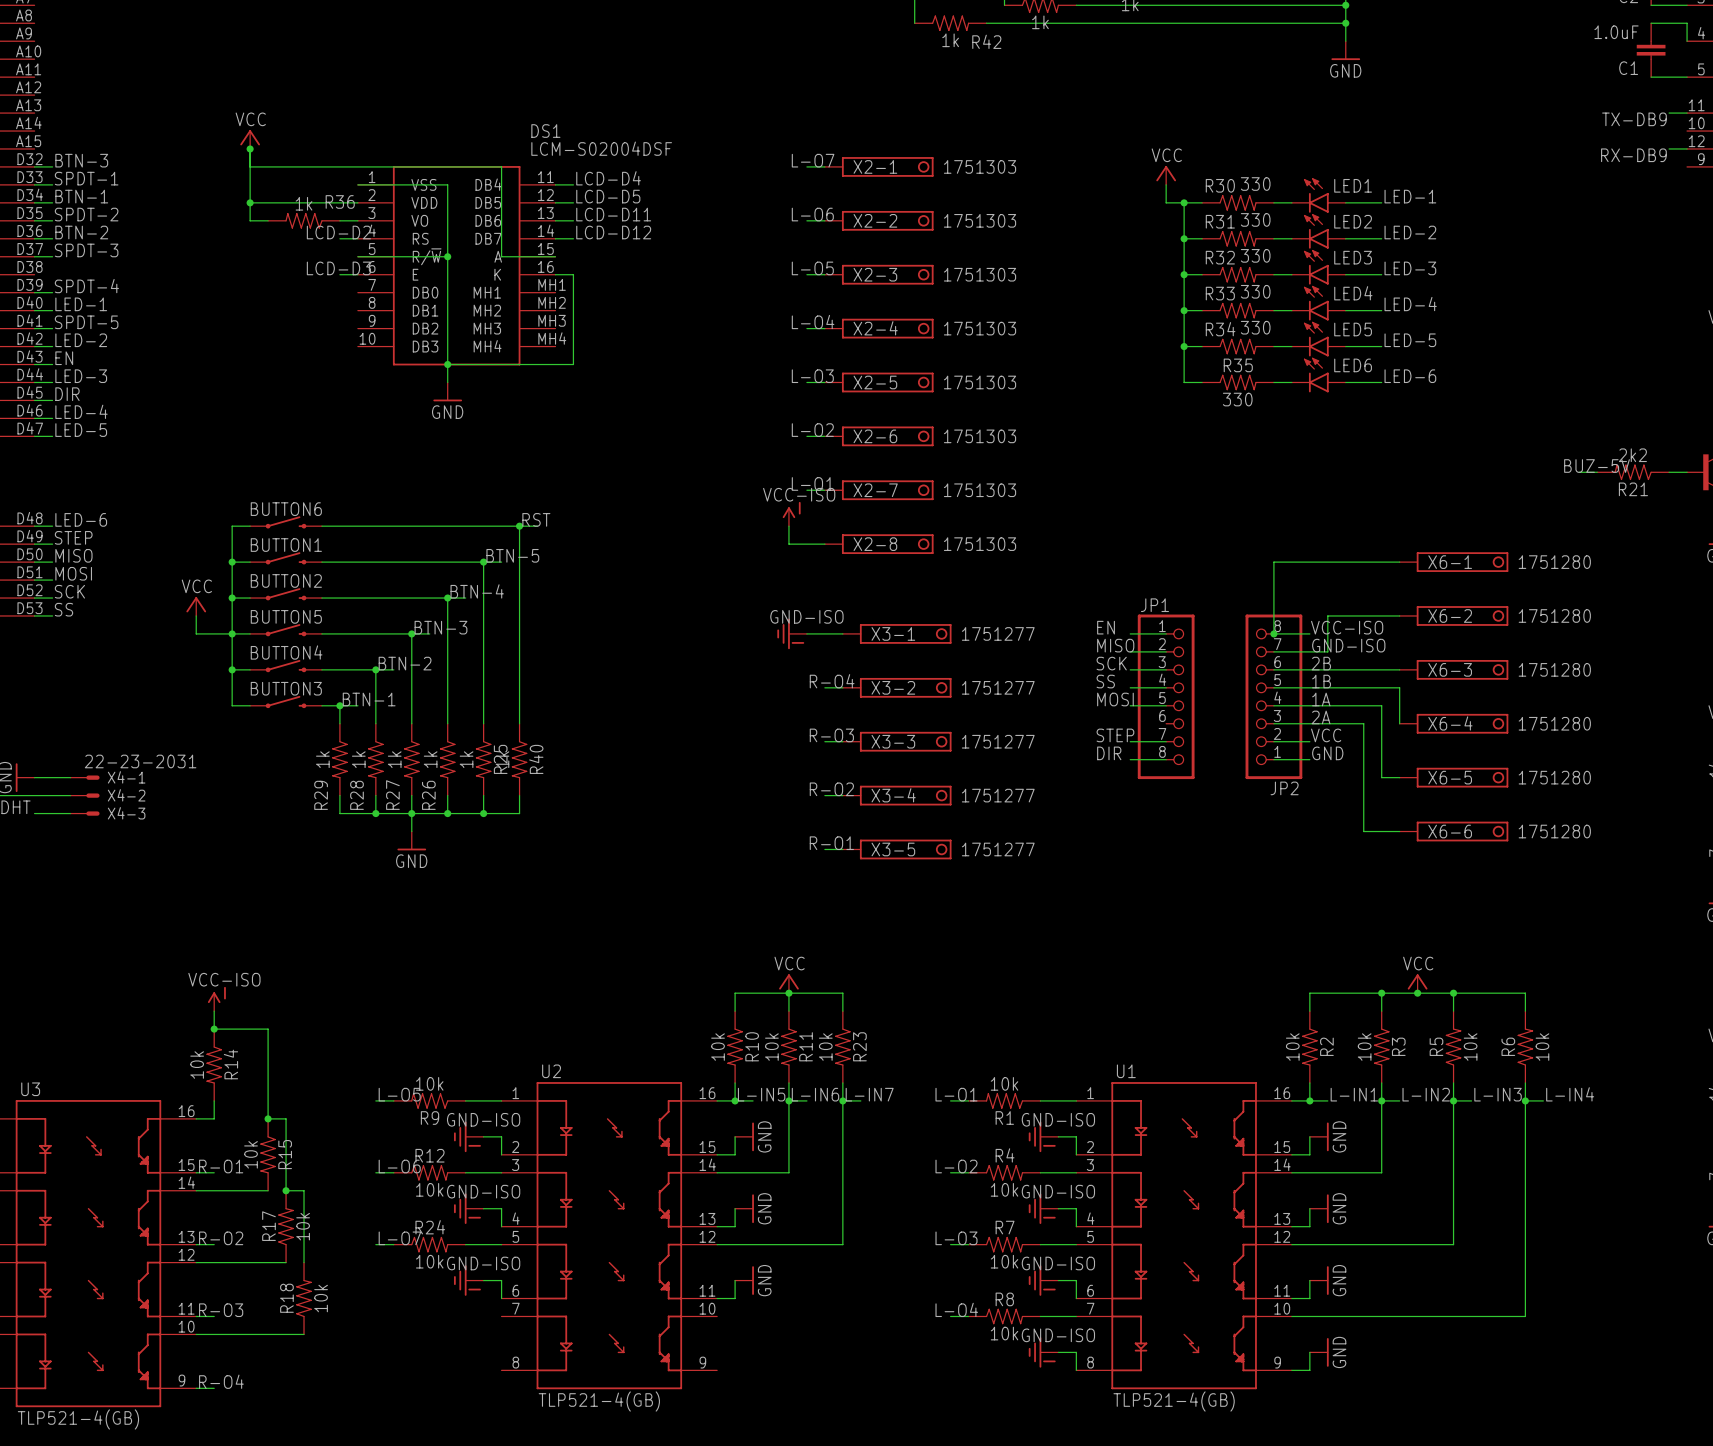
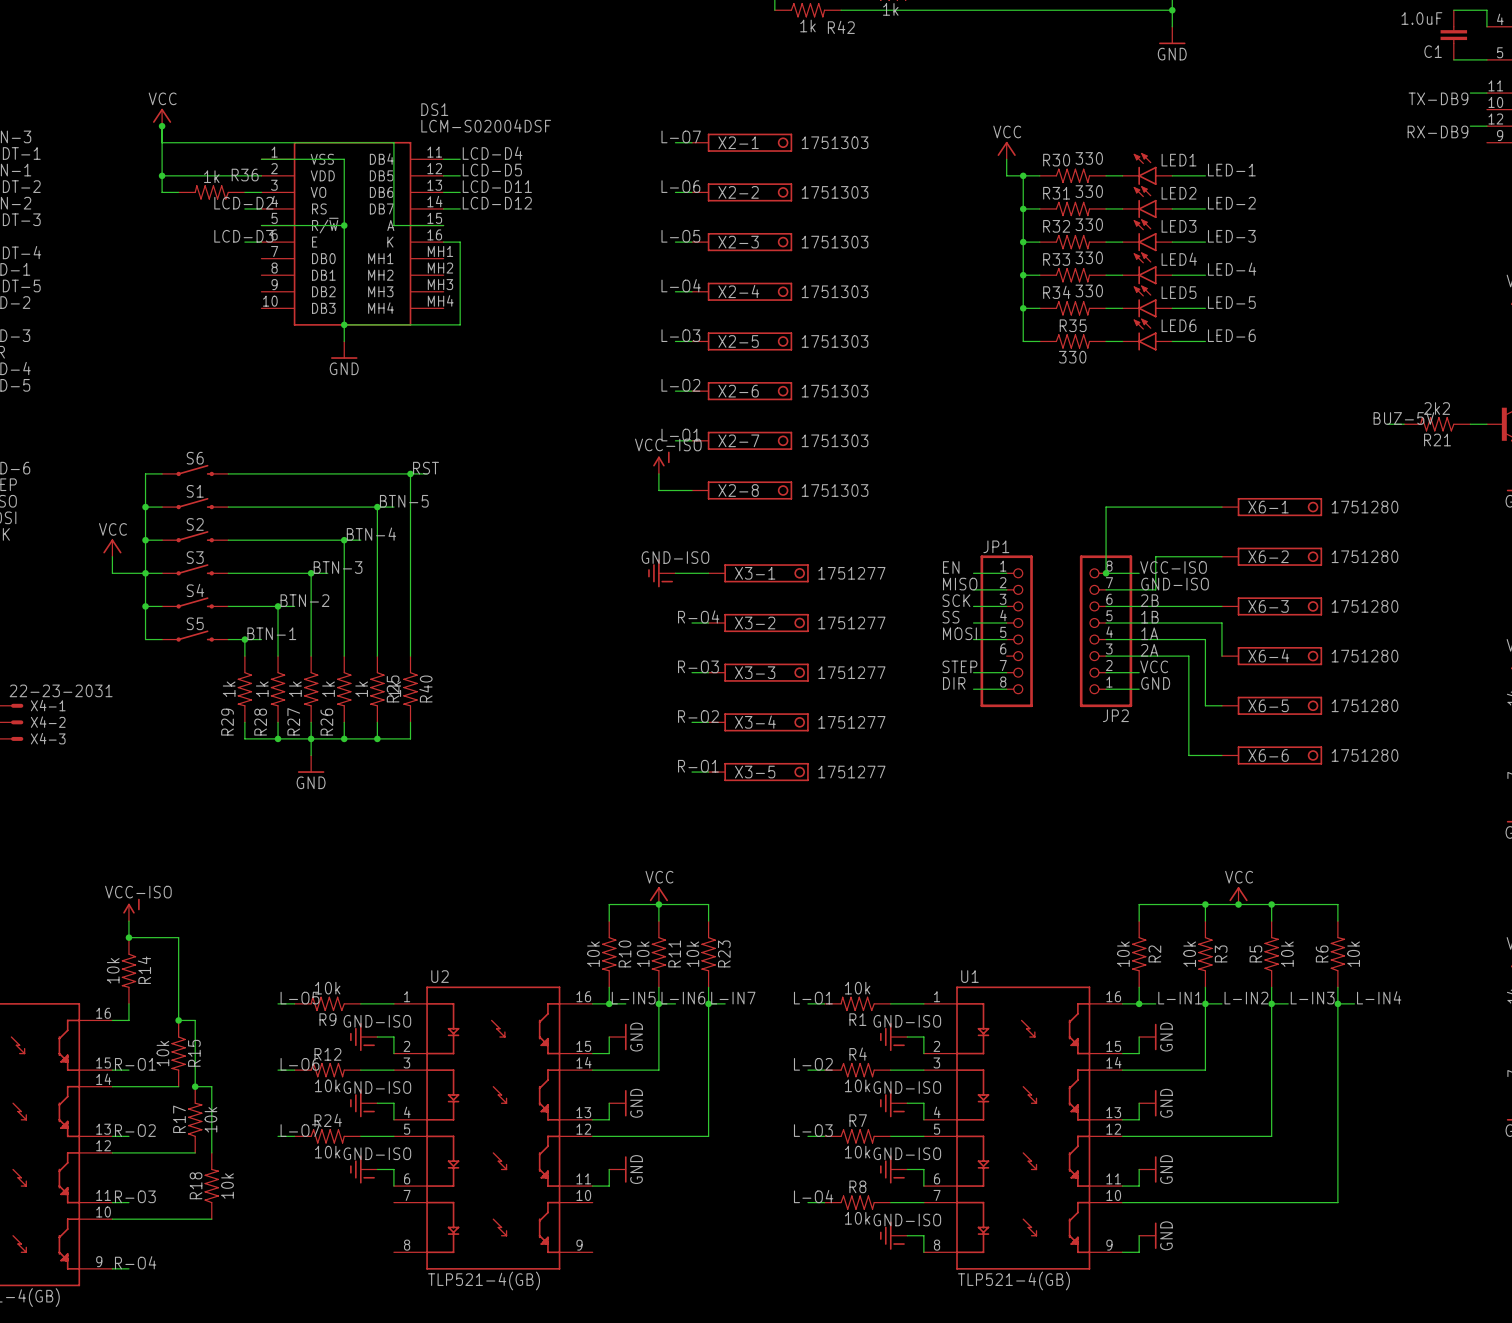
BUTTON6 name: BUTTON6 (286, 509) -> S6 (195, 458)
BUTTON1 name: BUTTON1 (286, 545) -> S1 (195, 491)
BUTTON2 name: BUTTON2 (286, 580) -> S2 (195, 524)
BUTTON5 name: BUTTON5 (286, 616) -> S3 (195, 557)
BUTTON4 name: BUTTON4 (286, 652) -> S4 (195, 590)
BUTTON3 name: BUTTON3 (286, 688) -> S5 (195, 623)

